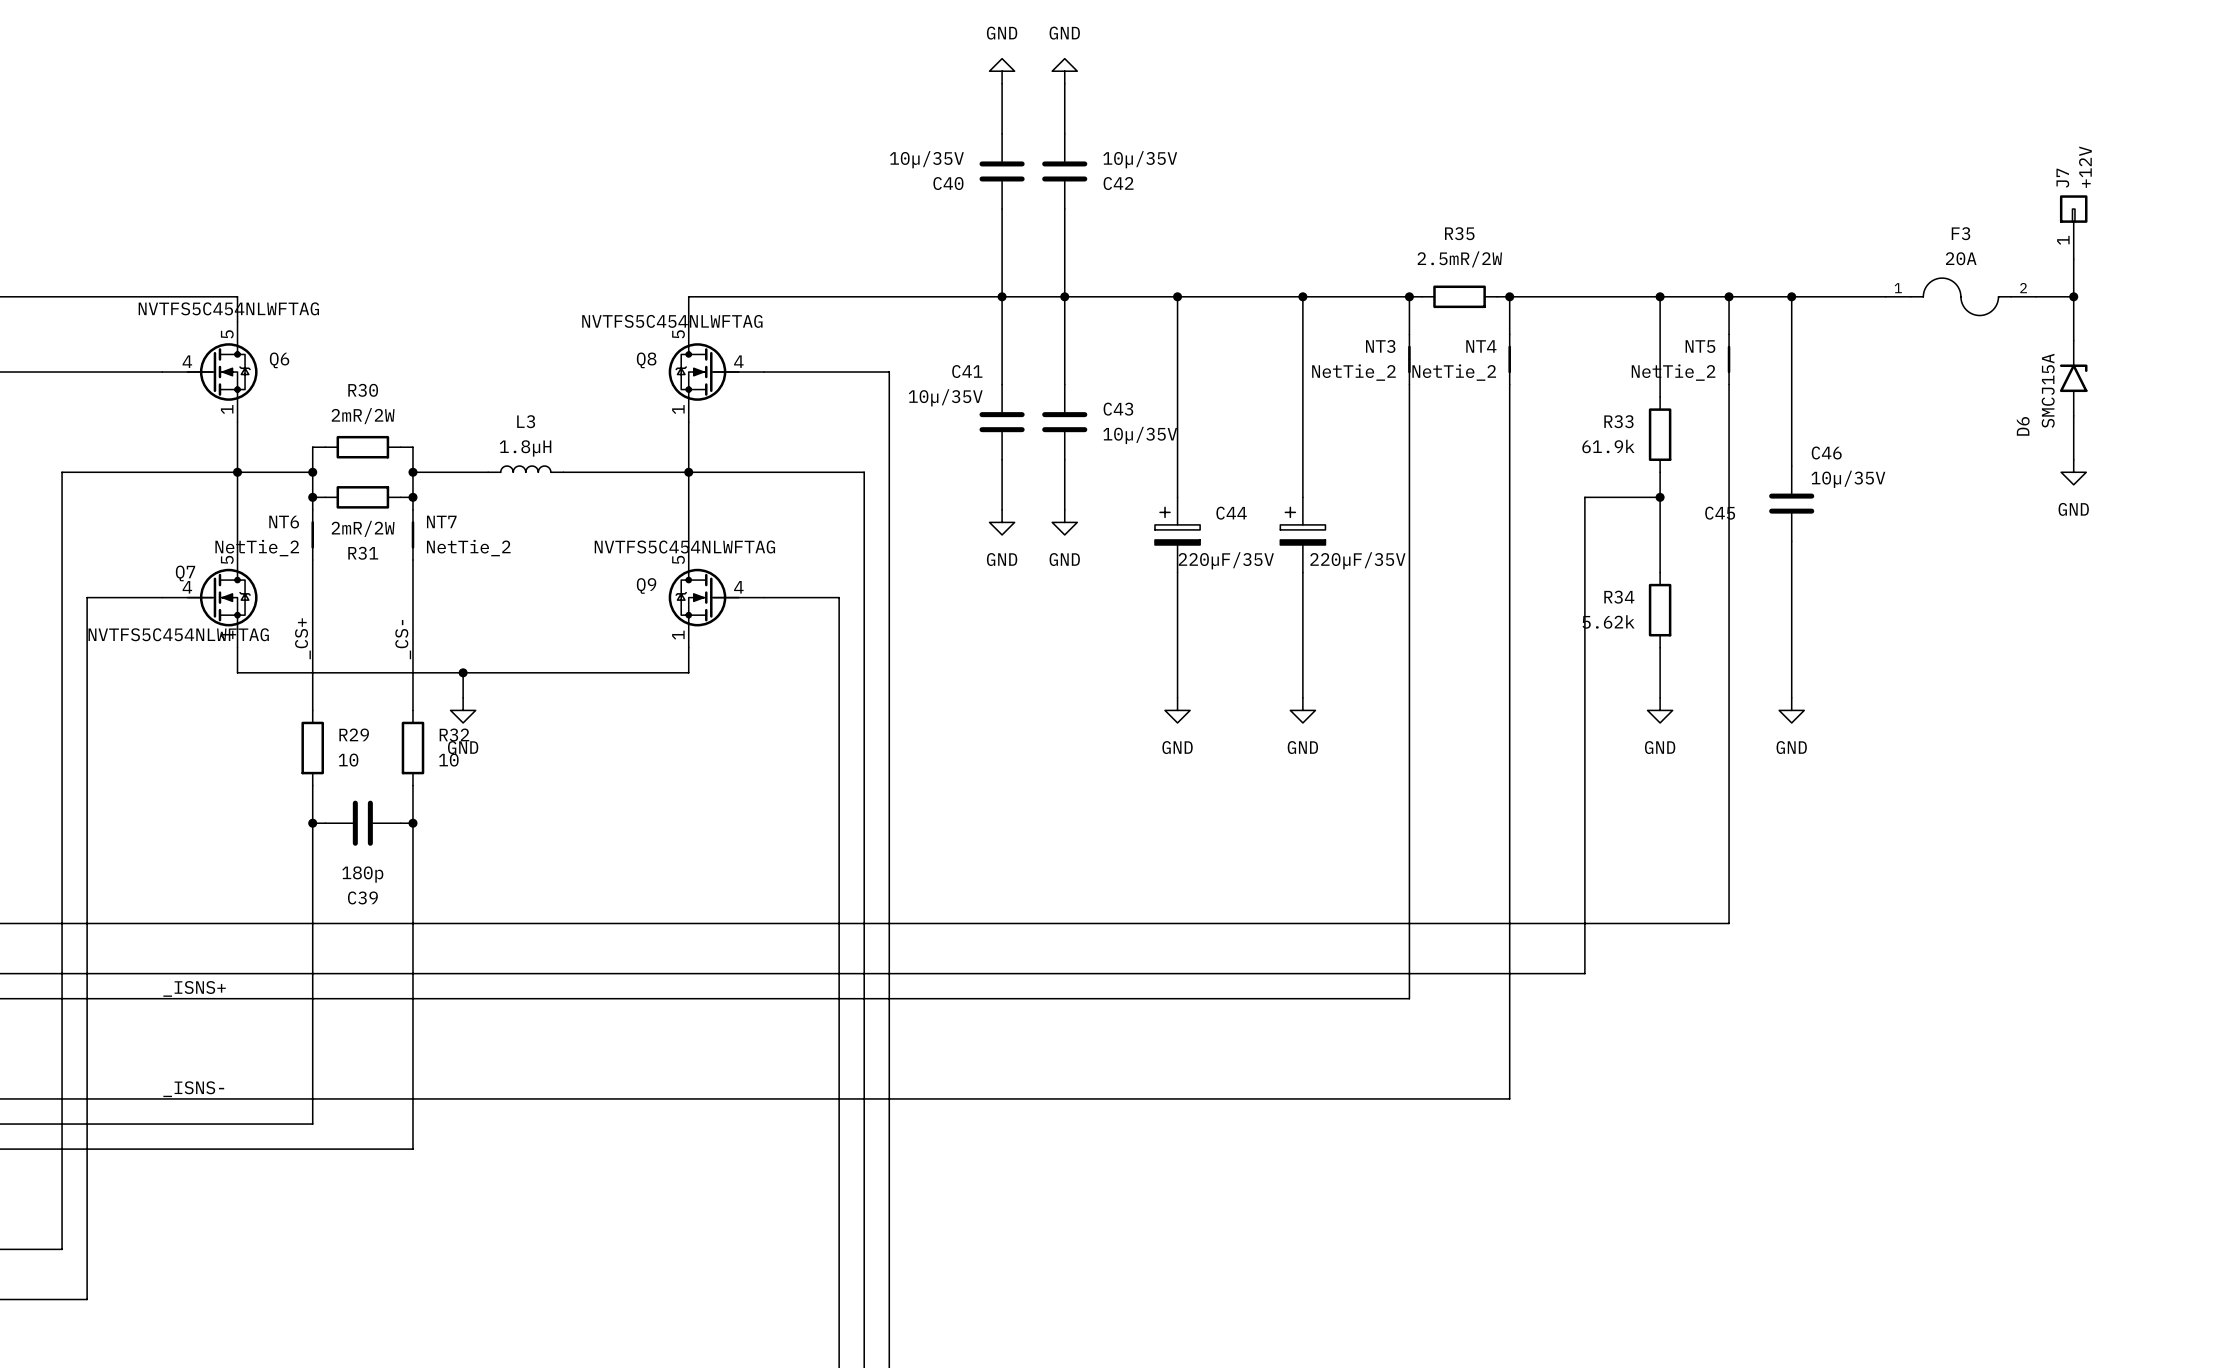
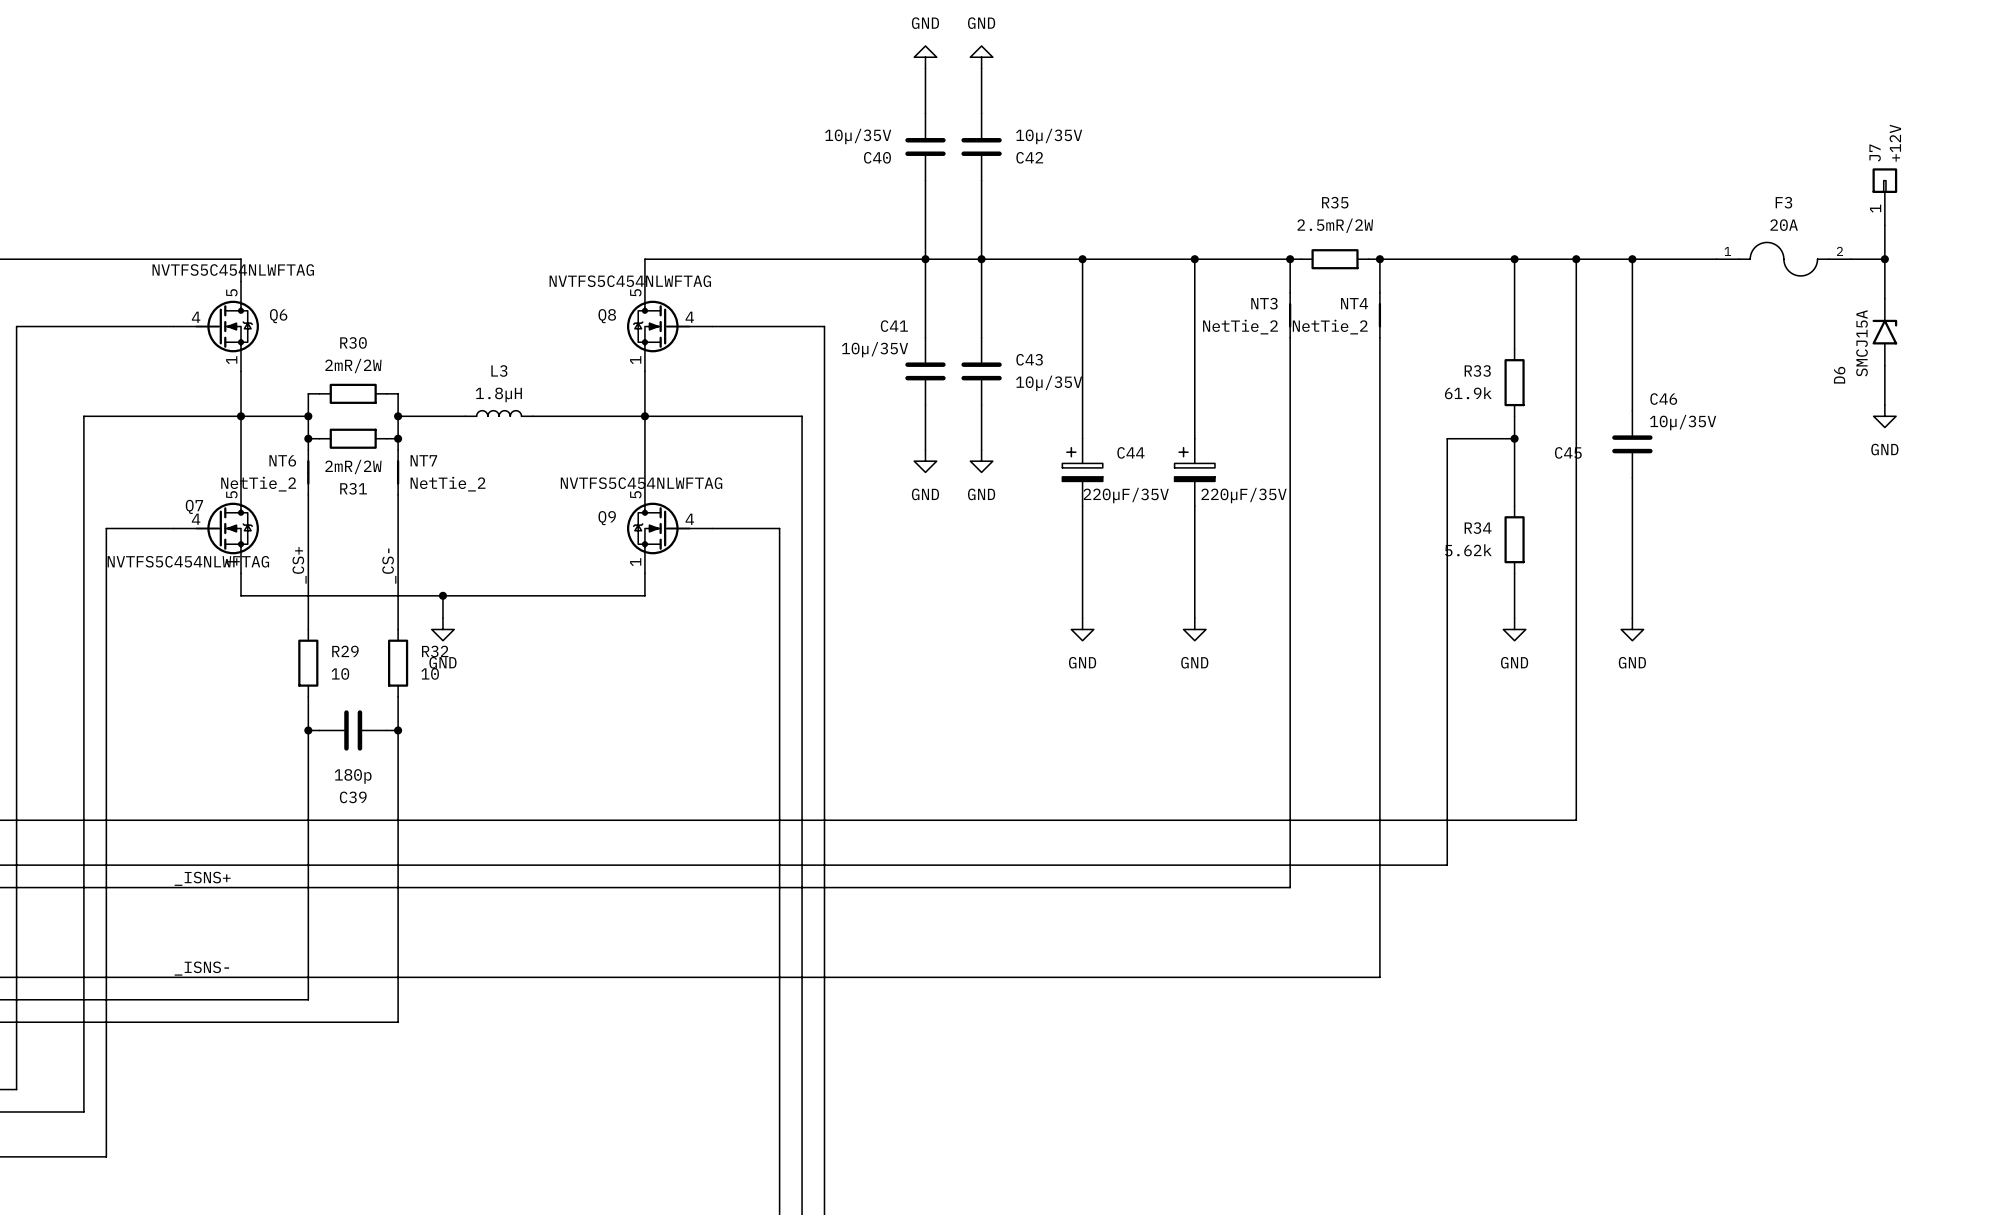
NT5: NetTie_2 (1729, 359) -> none

